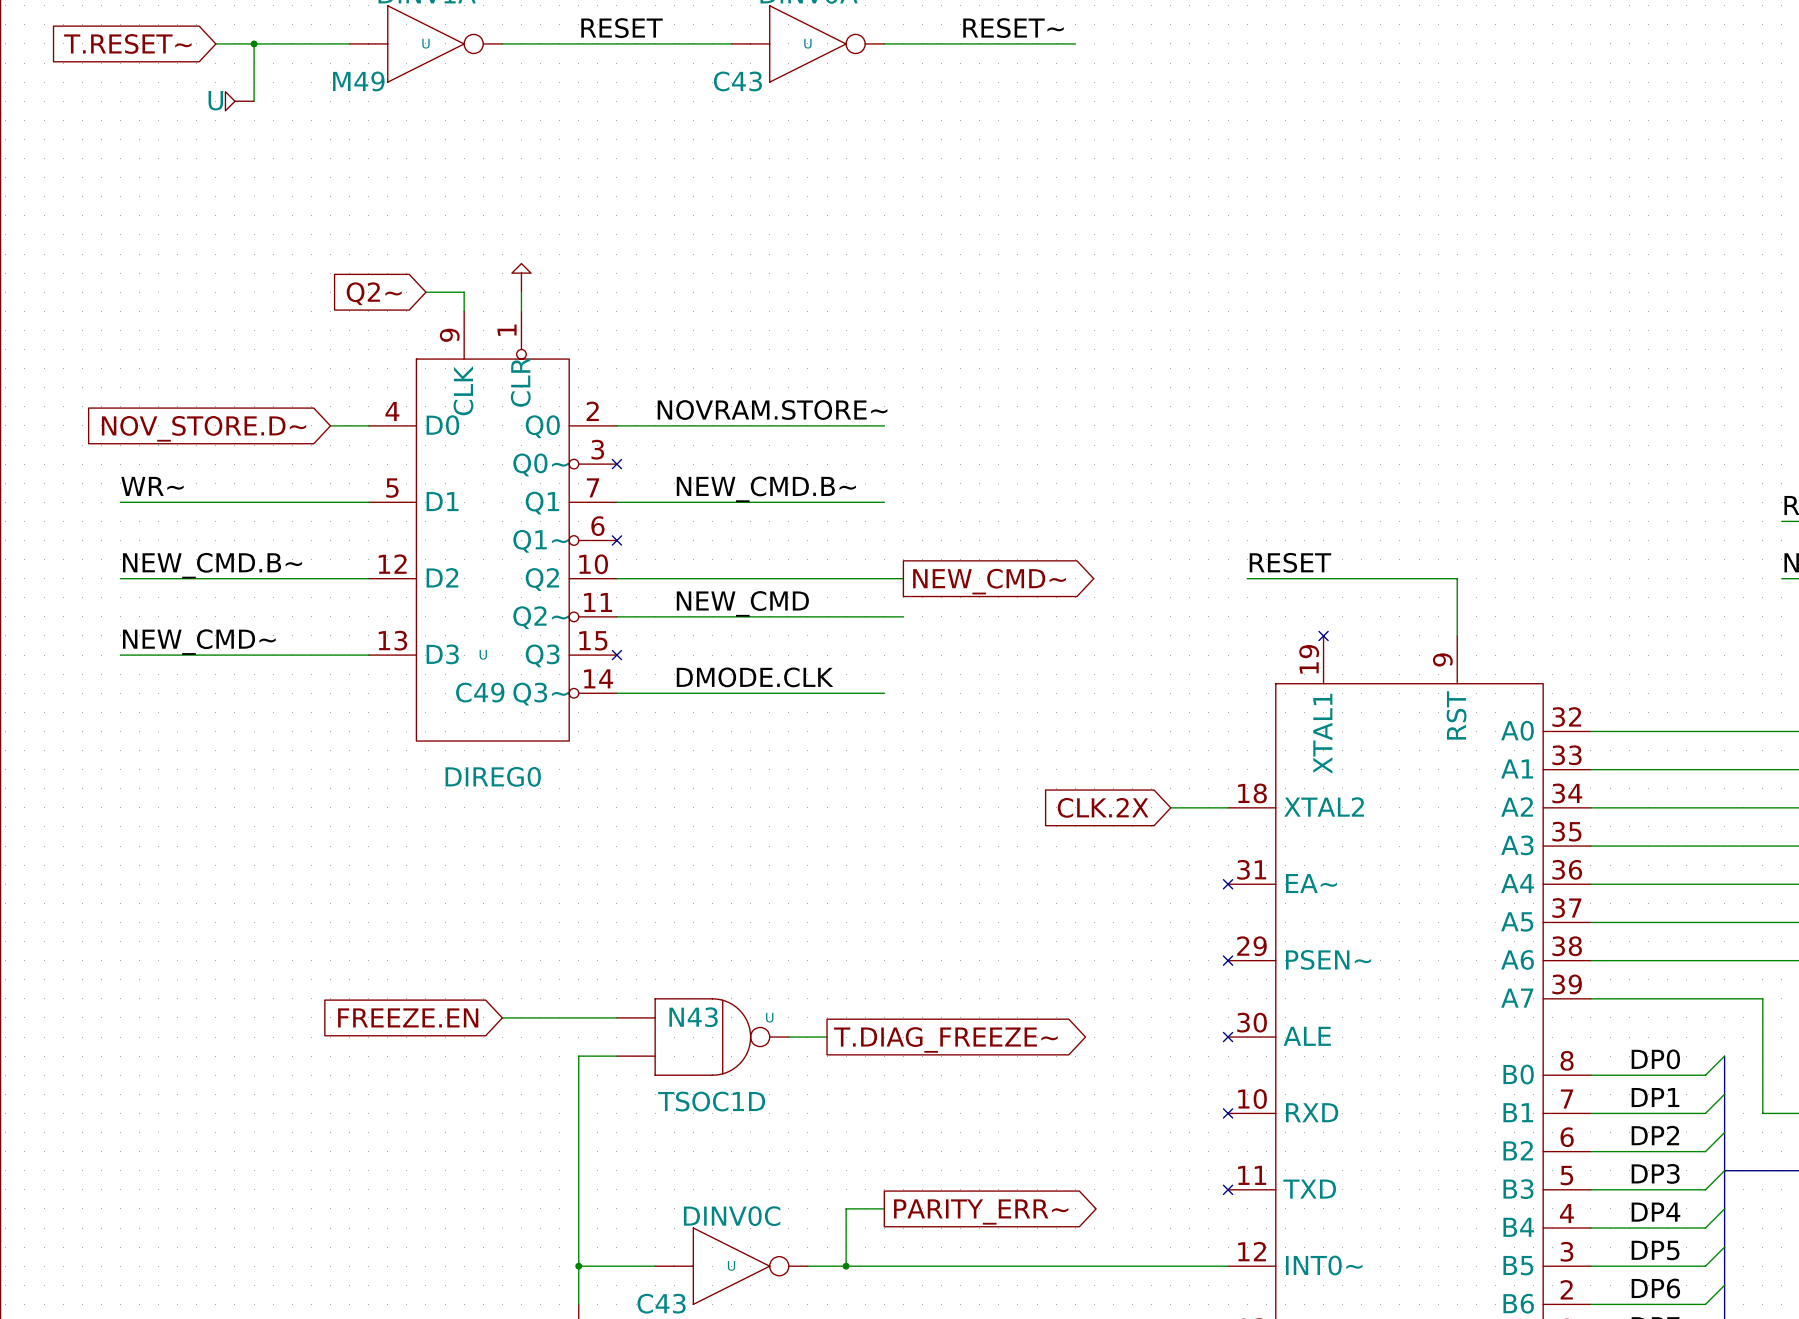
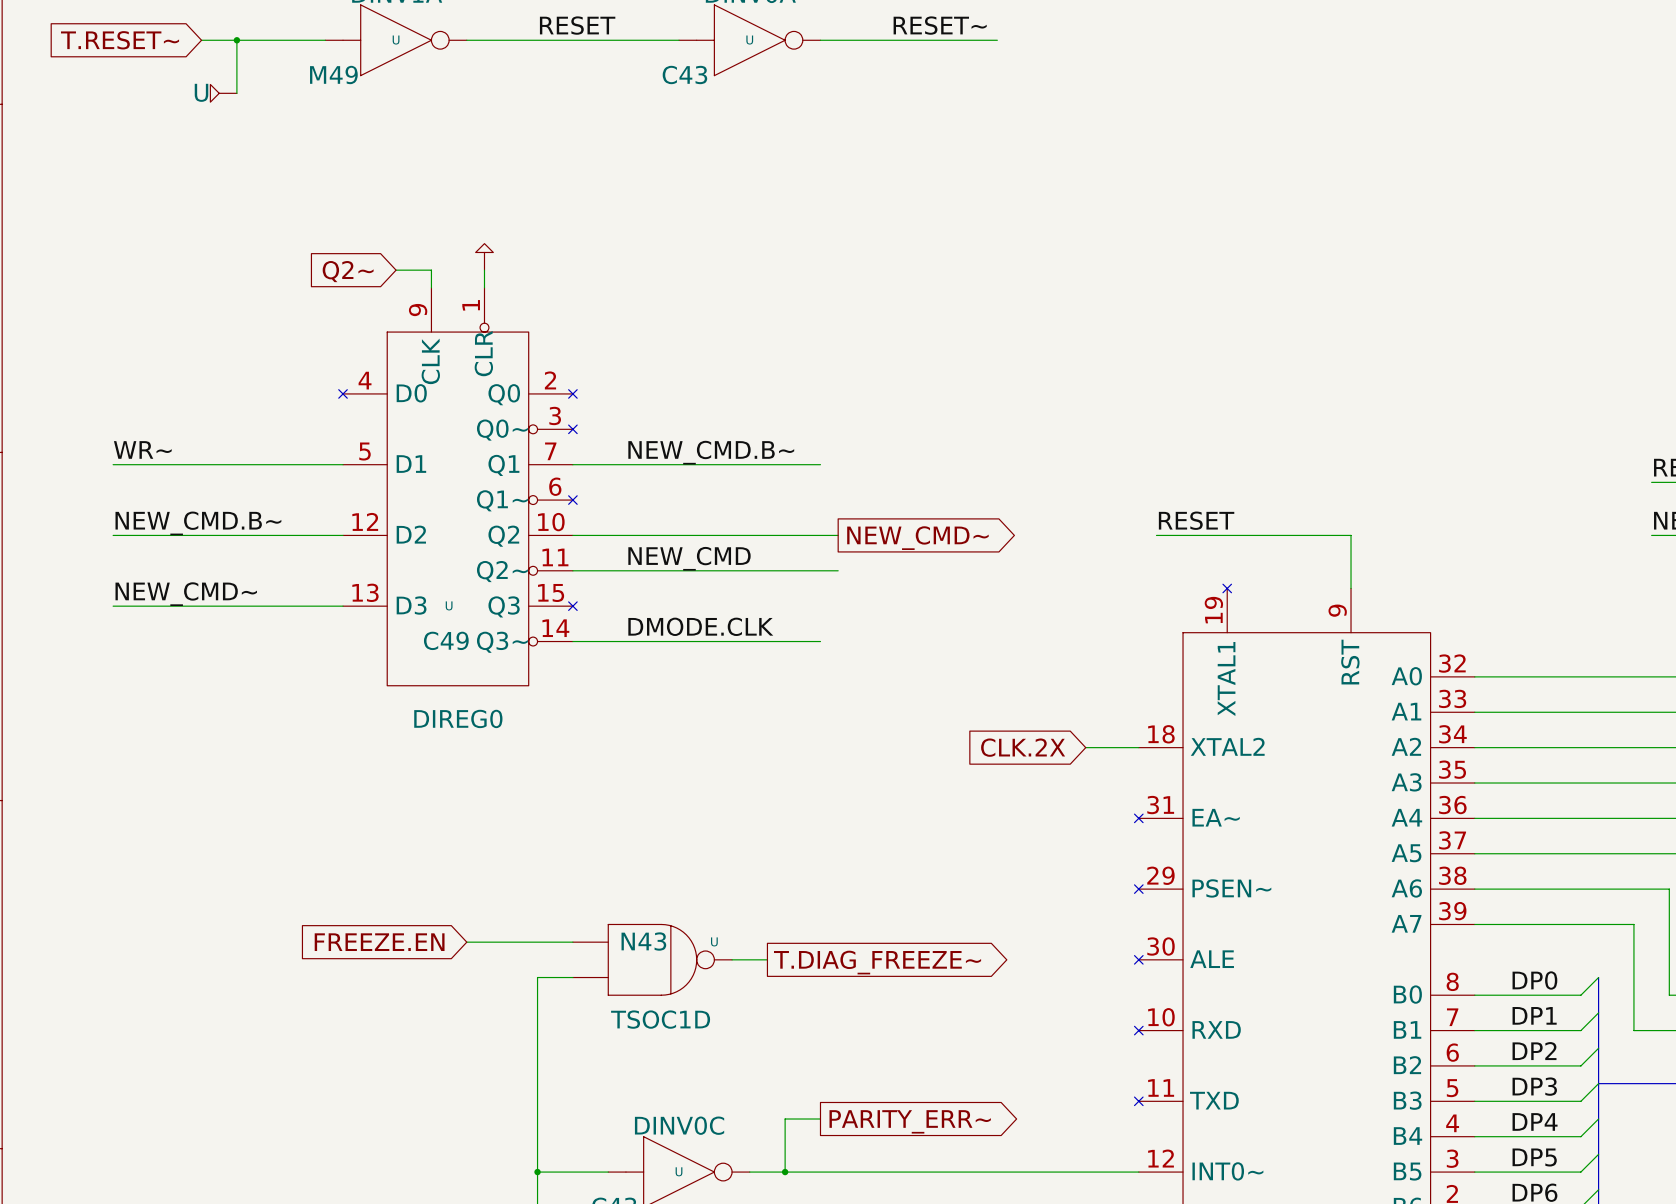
label: NOVRAM.STORE~ (772, 410) -> none
wire: (330, 425) (368, 425) -> none
no-connect mark: none -> (343, 393)
wire: (616, 425) (884, 425) -> none
no-connect mark: none -> (572, 393)
global label: NOV_STORE.D~ (204, 428) -> none

